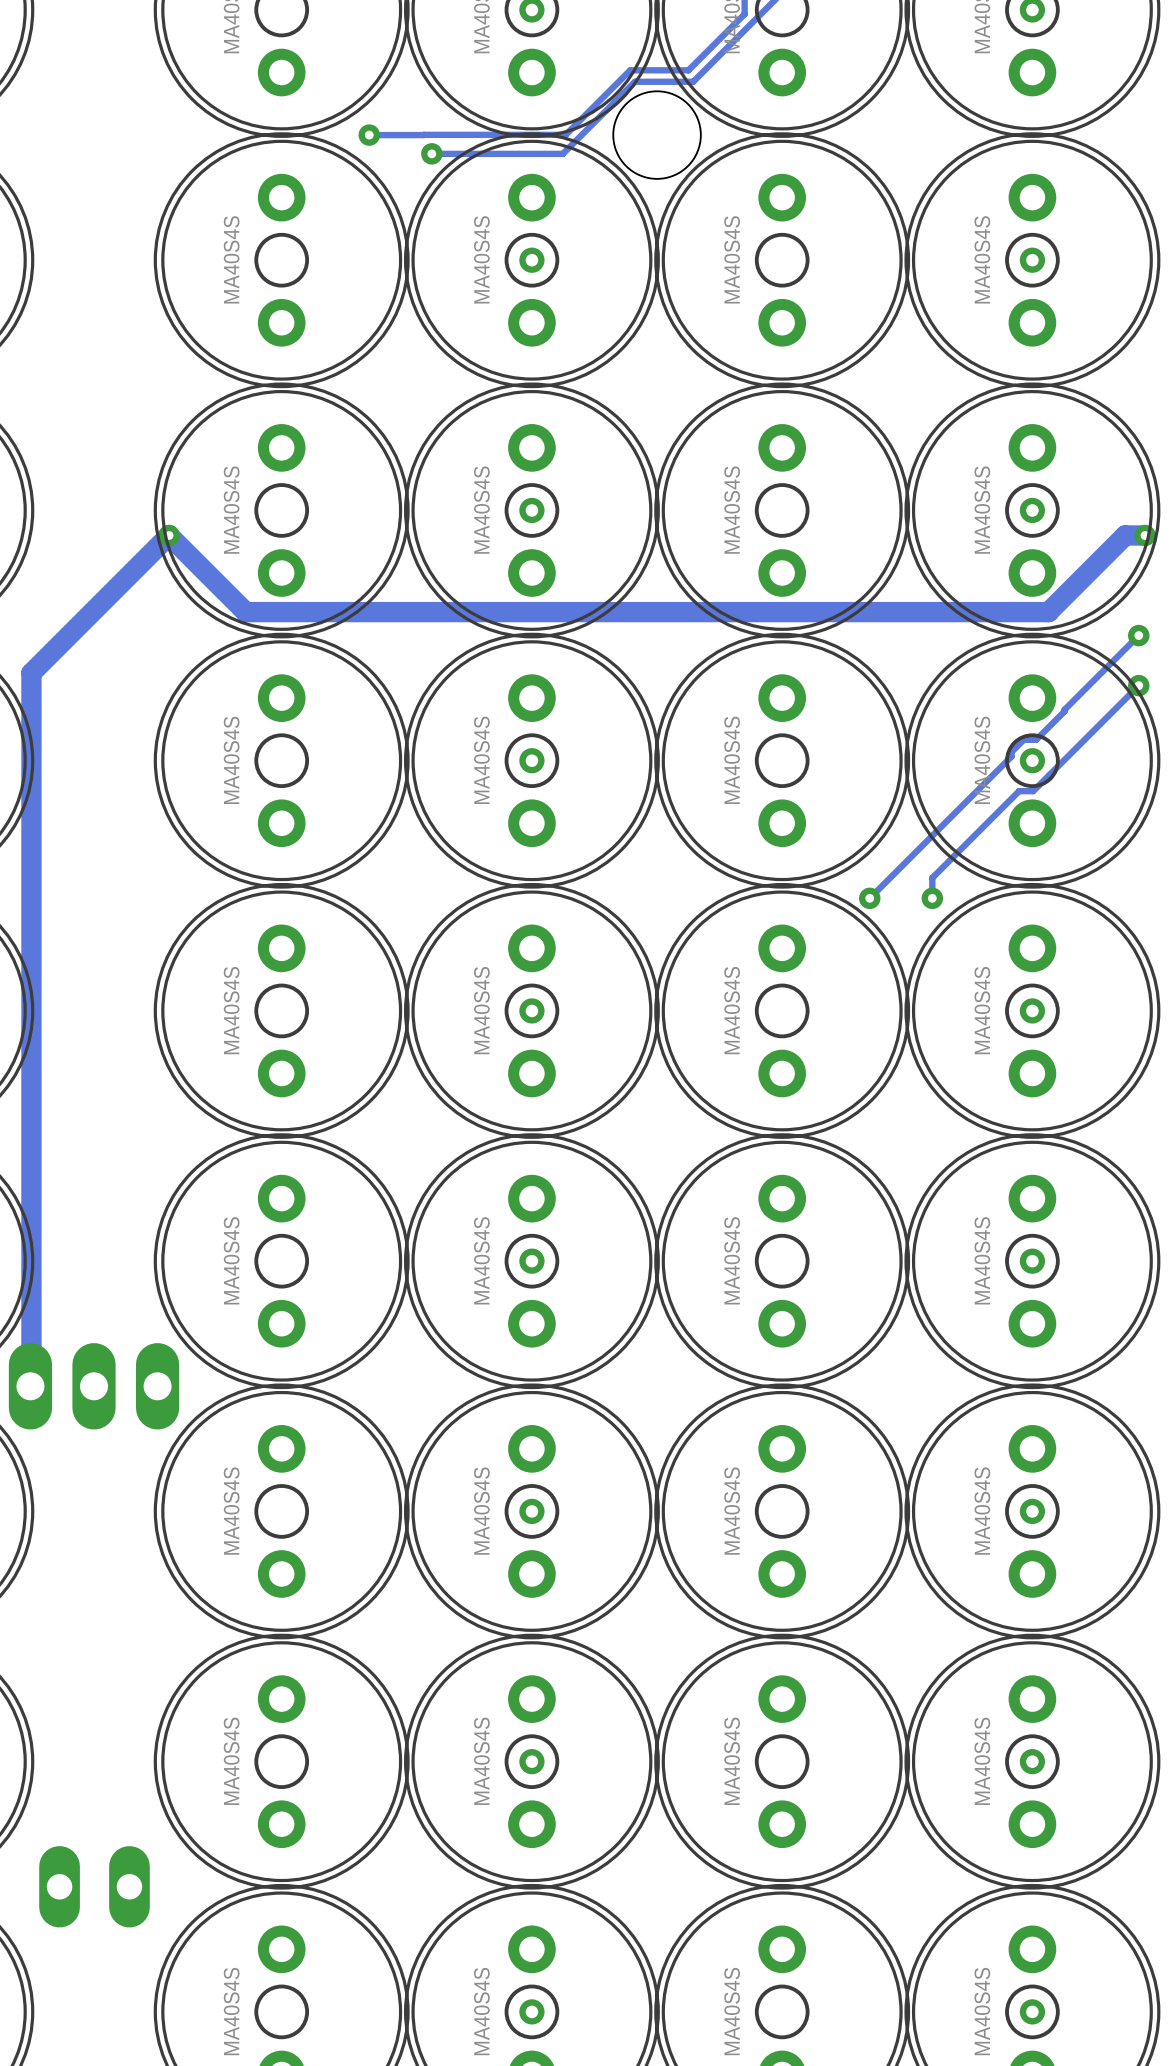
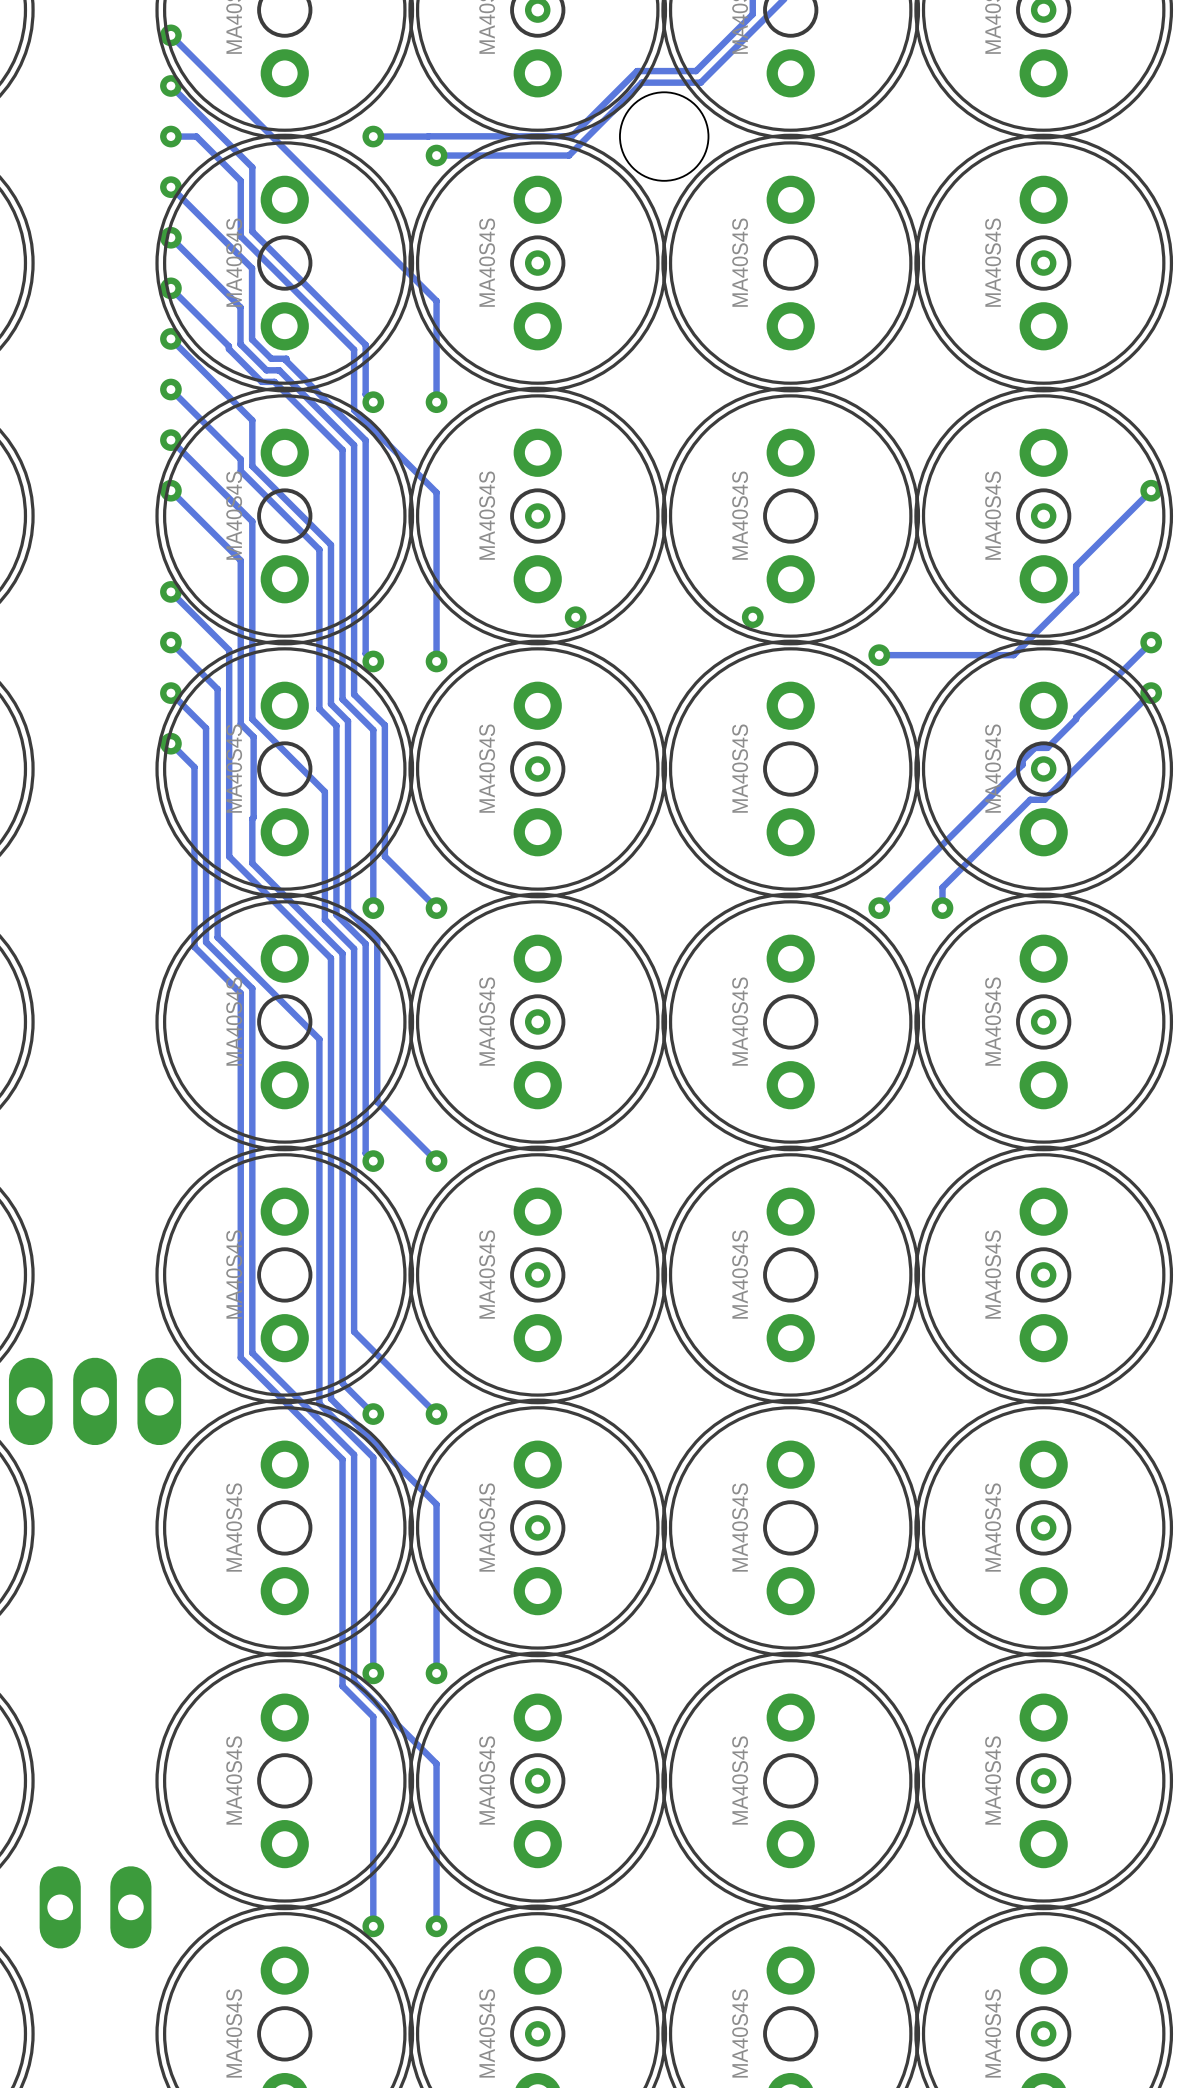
track: none -> (170, 35) (436, 300) (436, 402)
via: none -> (170, 35)
track: none -> (170, 85) (252, 167) (252, 231) (365, 344) (365, 394) (373, 402)
via: none -> (170, 85)
track: none -> (170, 136) (196, 136) (240, 180) (240, 236) (354, 349) (354, 410) (436, 492) (436, 661)
via: none -> (170, 136)
via: none -> (170, 187)
track: none -> (178, 187) (170, 187) (252, 268) (252, 339) (271, 358) (286, 358) (285, 359) (365, 440) (365, 653) (373, 661)
track: none -> (170, 237) (240, 307) (240, 344) (266, 370) (279, 370) (354, 445) (354, 694) (384, 725) (384, 856) (436, 908)
via: none -> (170, 237)
track: none -> (170, 288) (261, 381) (274, 381) (342, 449) (342, 699) (373, 730) (373, 908)
via: none -> (170, 288)
track: none -> (170, 338) (252, 420) (252, 466) (330, 544) (330, 704) (348, 721) (348, 909) (377, 939) (377, 1101) (436, 1161)
via: none -> (170, 338)
track: none -> (170, 389) (240, 459) (240, 471) (319, 549) (319, 708) (336, 725) (336, 914) (365, 944) (365, 1153) (373, 1161)
via: none -> (170, 389)
via: none -> (373, 402)
via: none -> (436, 402)
track: none -> (170, 440) (252, 521) (252, 719) (324, 791) (324, 919) (354, 948) (354, 1331) (436, 1414)
via: none -> (170, 440)
track: none -> (170, 490) (240, 560) (240, 723) (253, 736) (252, 863) (342, 953) (342, 1383) (373, 1414)
via: none -> (170, 490)
track: none -> (1151, 490) (1076, 565) (1076, 592) (1013, 655) (879, 655)
via: (169, 535) -> none
track: (1145, 535) (1125, 535) (1048, 612) (245, 612) (169, 535) (31, 673) (30, 1386) -> none
via position: (1145, 535) -> (1151, 490)
track: none -> (170, 591) (229, 650) (229, 856) (330, 958) (330, 1398) (436, 1504) (436, 1673)
via: none -> (170, 591)
via: none -> (575, 617)
via: none -> (752, 617)
track: none -> (170, 642) (217, 689) (217, 937) (319, 1039) (319, 1403) (373, 1457) (373, 1673)
via: none -> (170, 642)
via: none -> (879, 655)
via: none -> (373, 661)
via: none -> (436, 661)
track: none -> (170, 693) (206, 728) (206, 942) (252, 988) (252, 1352) (354, 1454) (354, 1681) (436, 1763) (436, 1926)
via: none -> (170, 693)
track: none -> (170, 743) (194, 767) (194, 947) (240, 993) (240, 1357) (342, 1459) (342, 1686) (373, 1716) (373, 1926)
via: none -> (170, 743)
via: none -> (373, 908)
via: none -> (436, 908)
via: none -> (373, 1161)
via: none -> (436, 1161)
via: none -> (373, 1414)
via: none -> (436, 1414)
via: none -> (373, 1673)
via: none -> (436, 1673)
via: none -> (373, 1926)
via: none -> (436, 1926)

